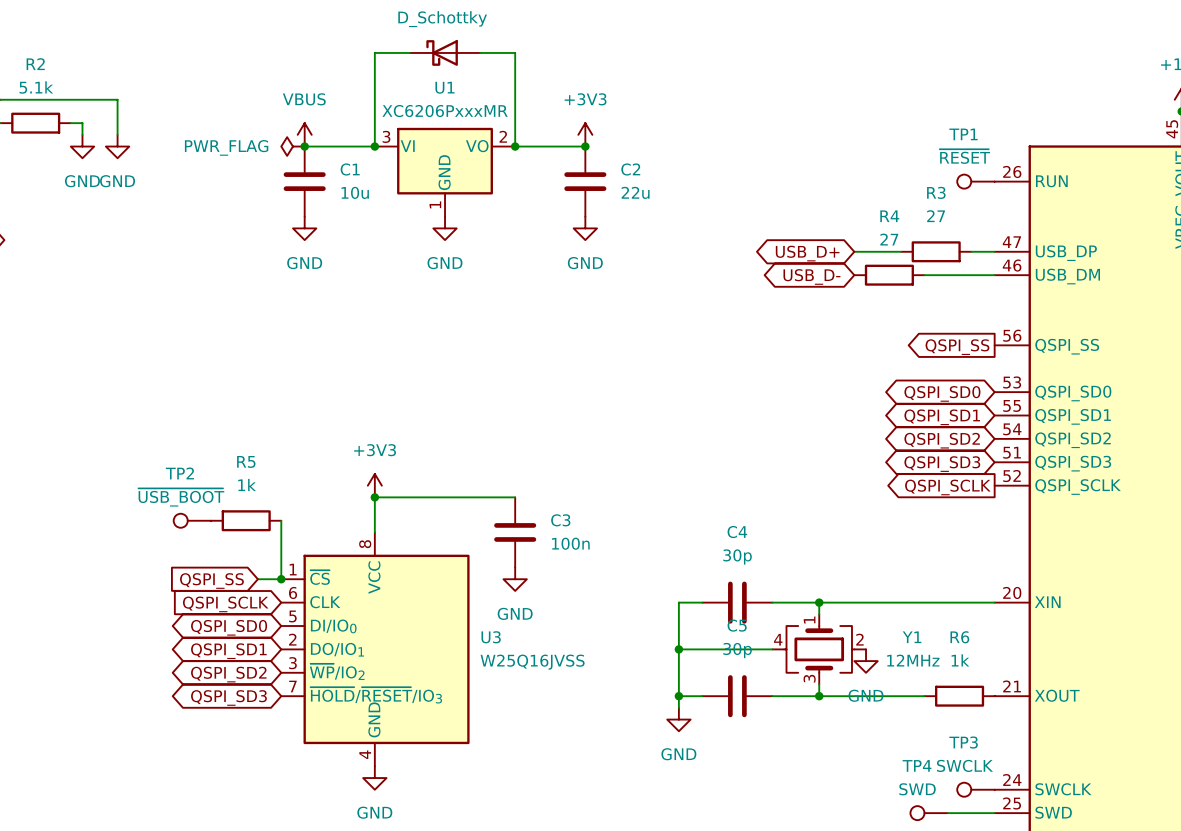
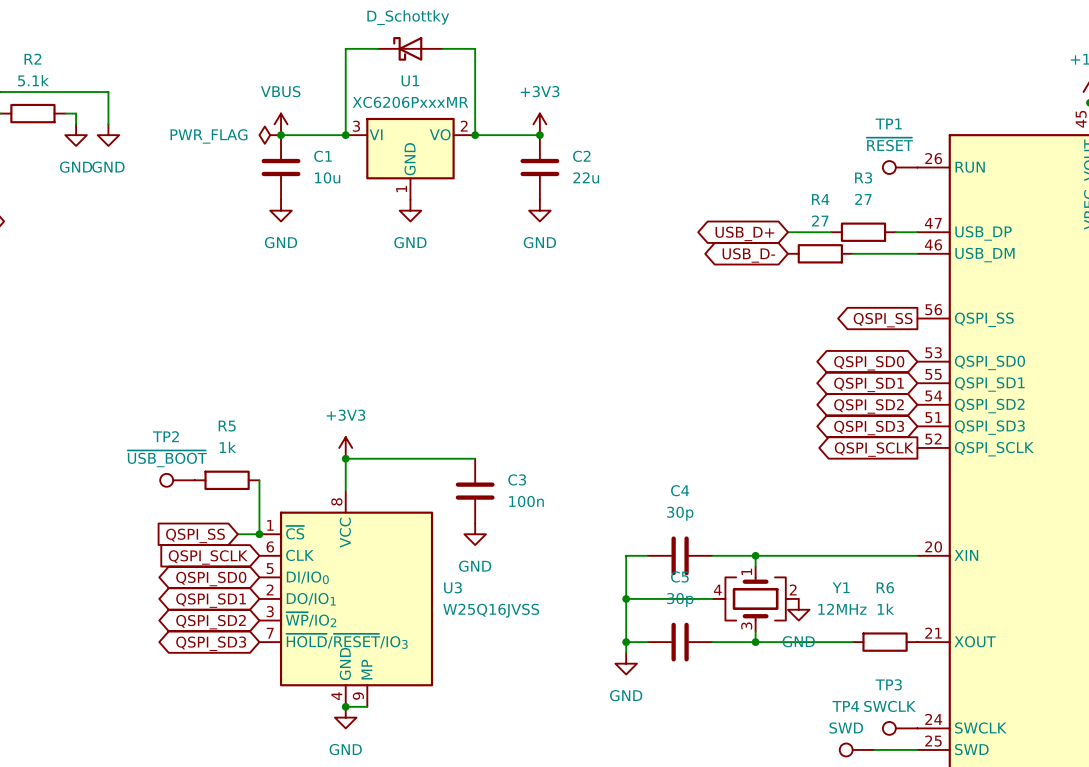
U3 symbol: [281, 532, 470, 767] -> [259, 491, 434, 707]
wire: none -> (345, 706) (367, 706)
junction: none -> (345, 706)

